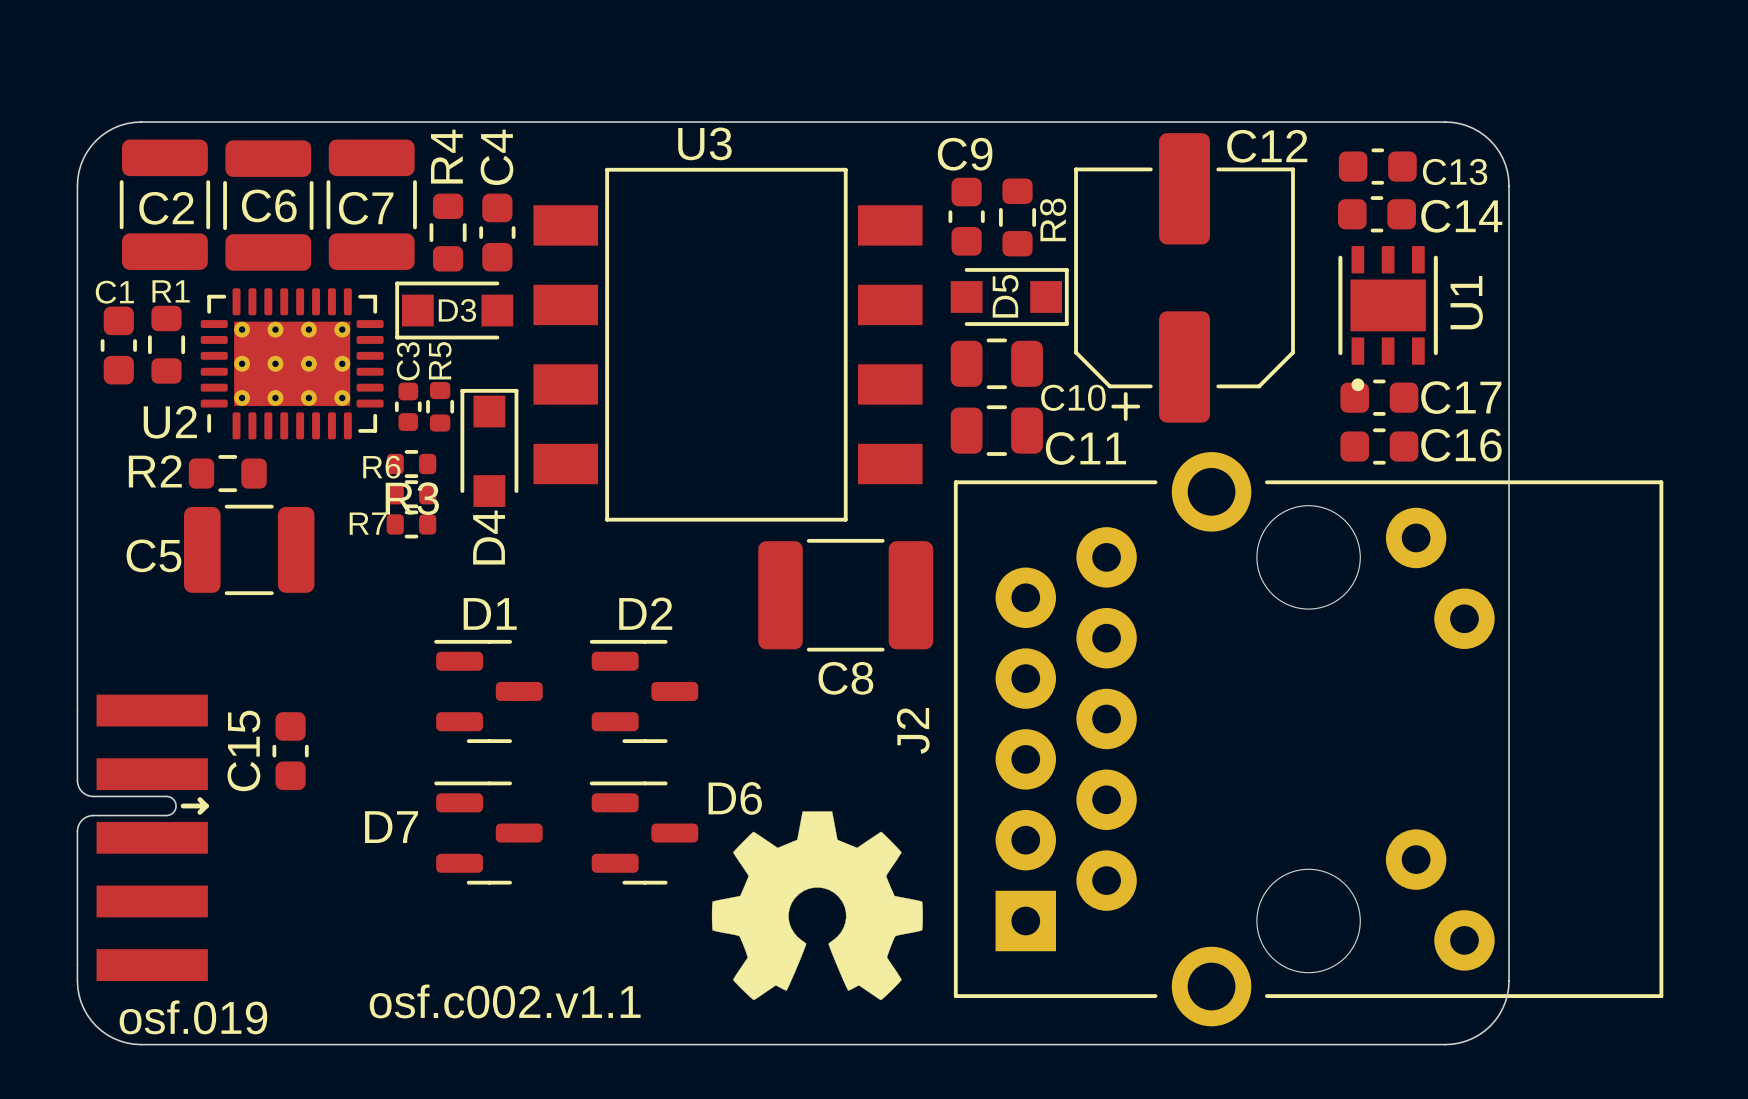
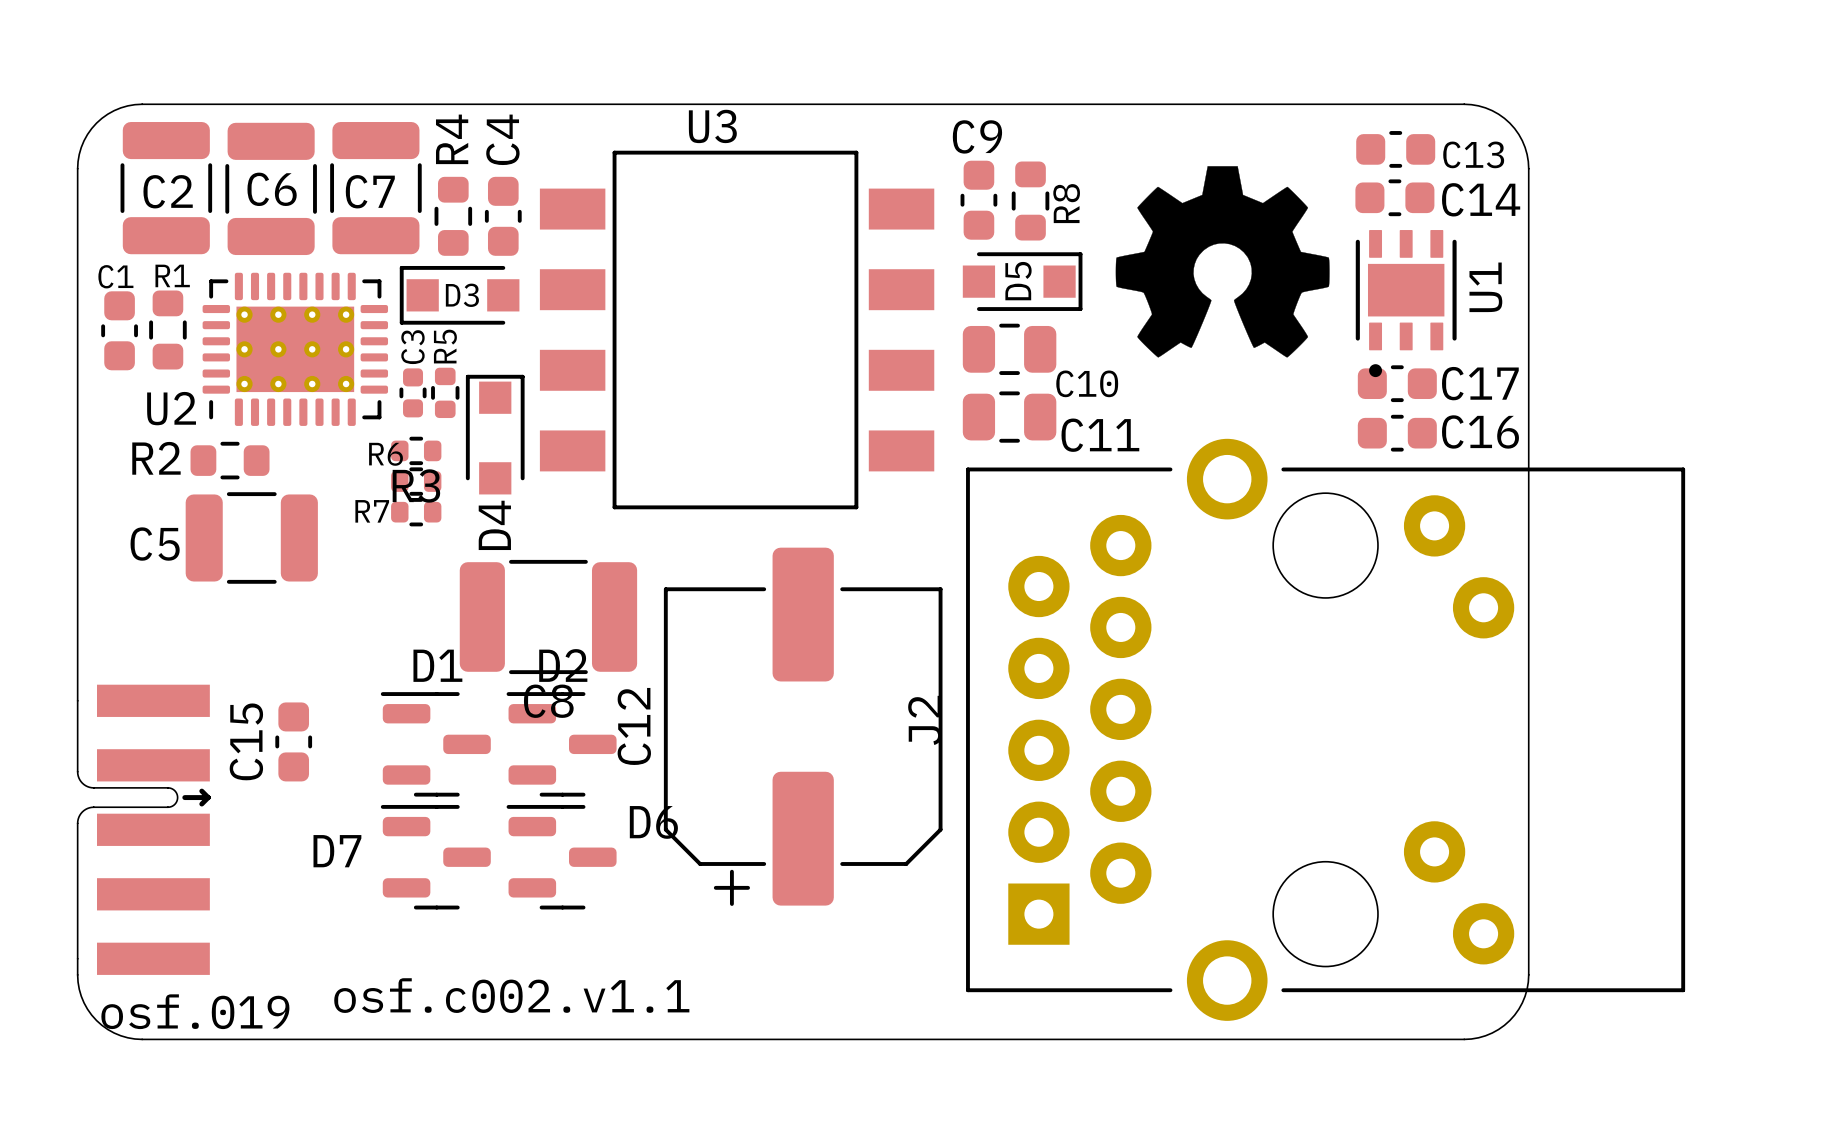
C12 footprint: [1074, 133, 1295, 423] -> [663, 547, 943, 906]
C12 name position: C12 (1267, 146) -> C12 (634, 726)
C8 position: (845, 595) -> (548, 616)
D1 position: (488, 691) -> (435, 744)
D2 position: (644, 691) -> (561, 744)
D7 position: (488, 833) -> (435, 857)
D6 position: (644, 833) -> (561, 857)
drawing position: (817, 905) -> (1222, 261)

